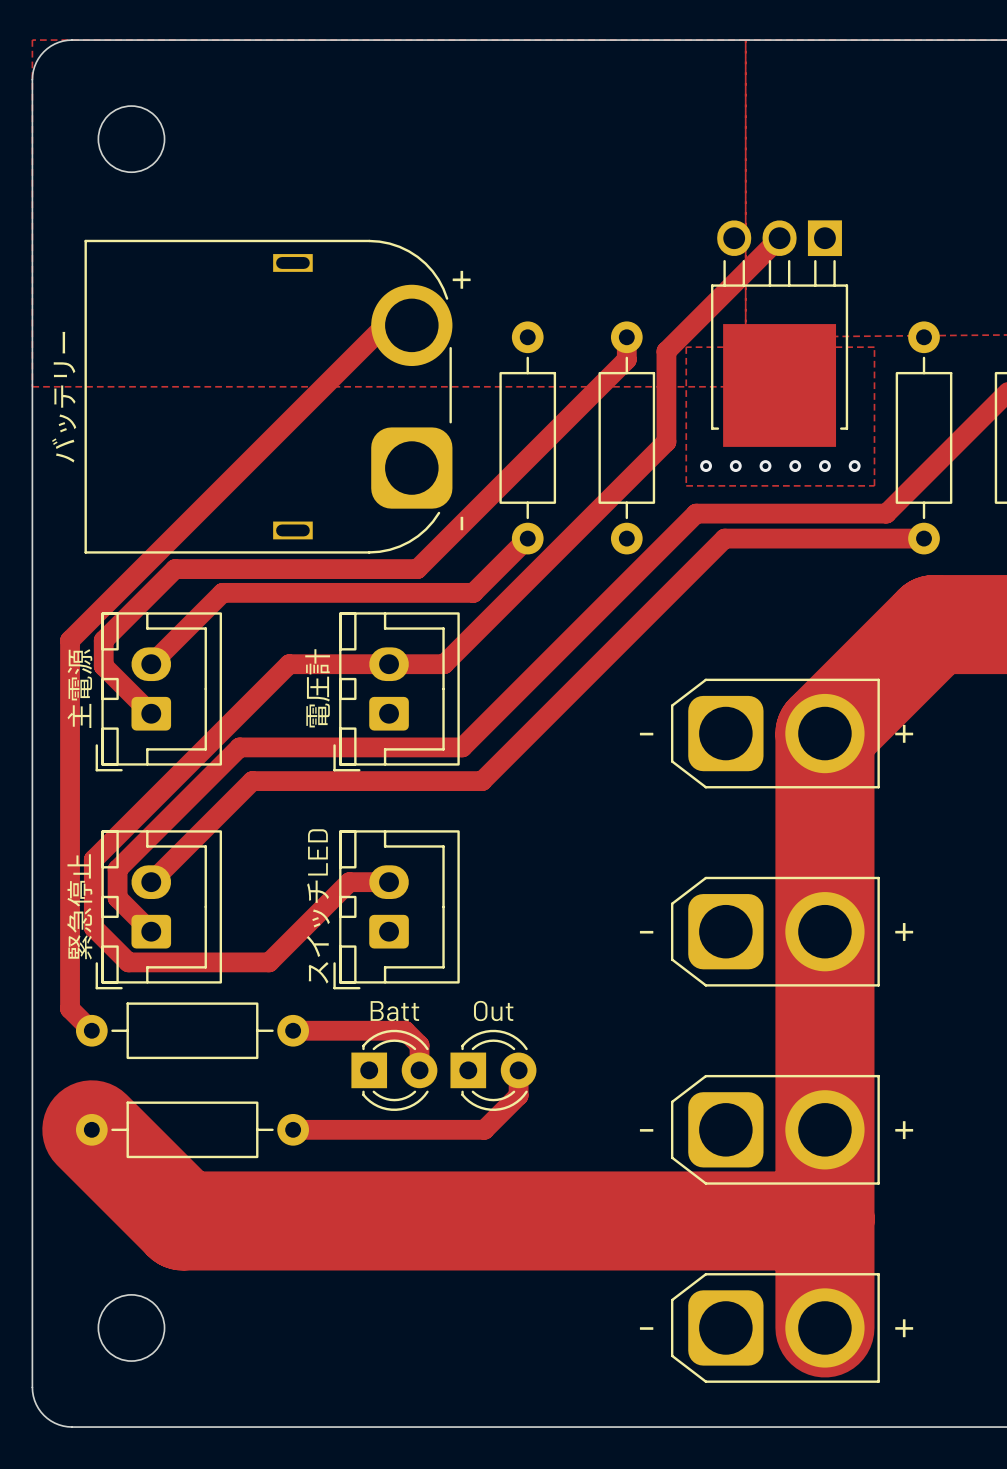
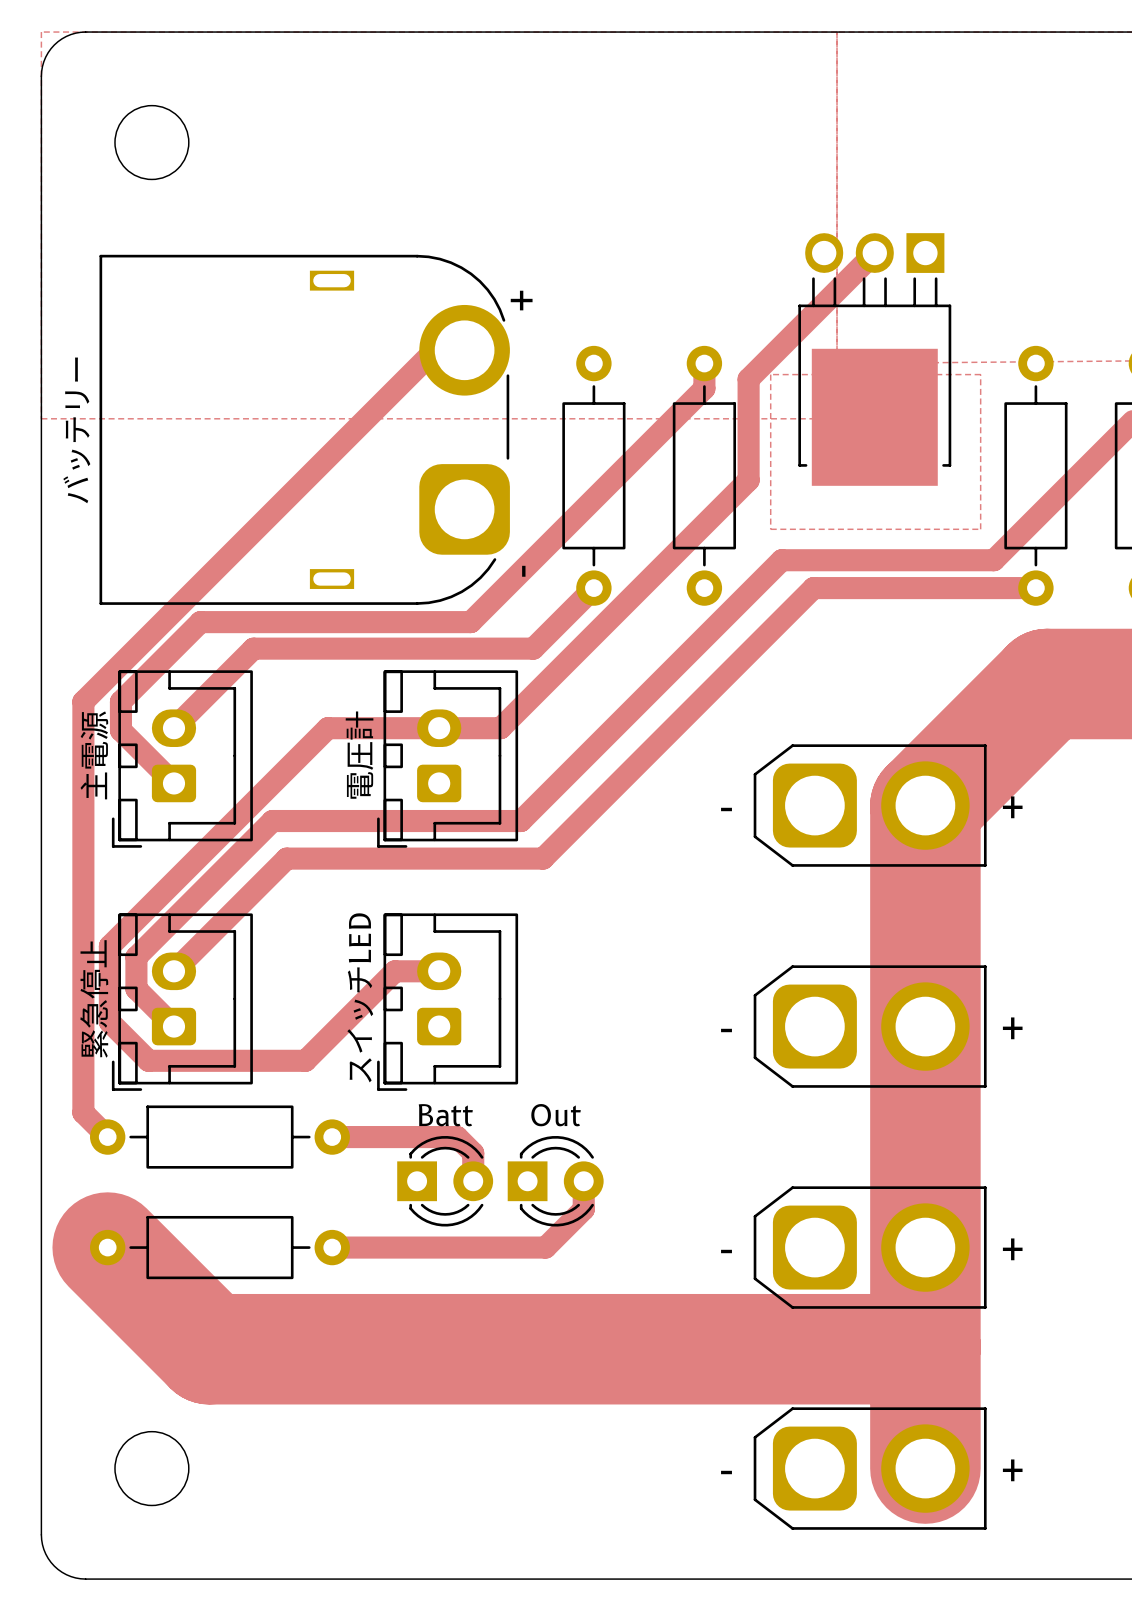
via: (706, 466) -> none
via: (735, 466) -> none
via: (765, 466) -> none
via: (795, 466) -> none
via: (824, 466) -> none
via: (854, 466) -> none

